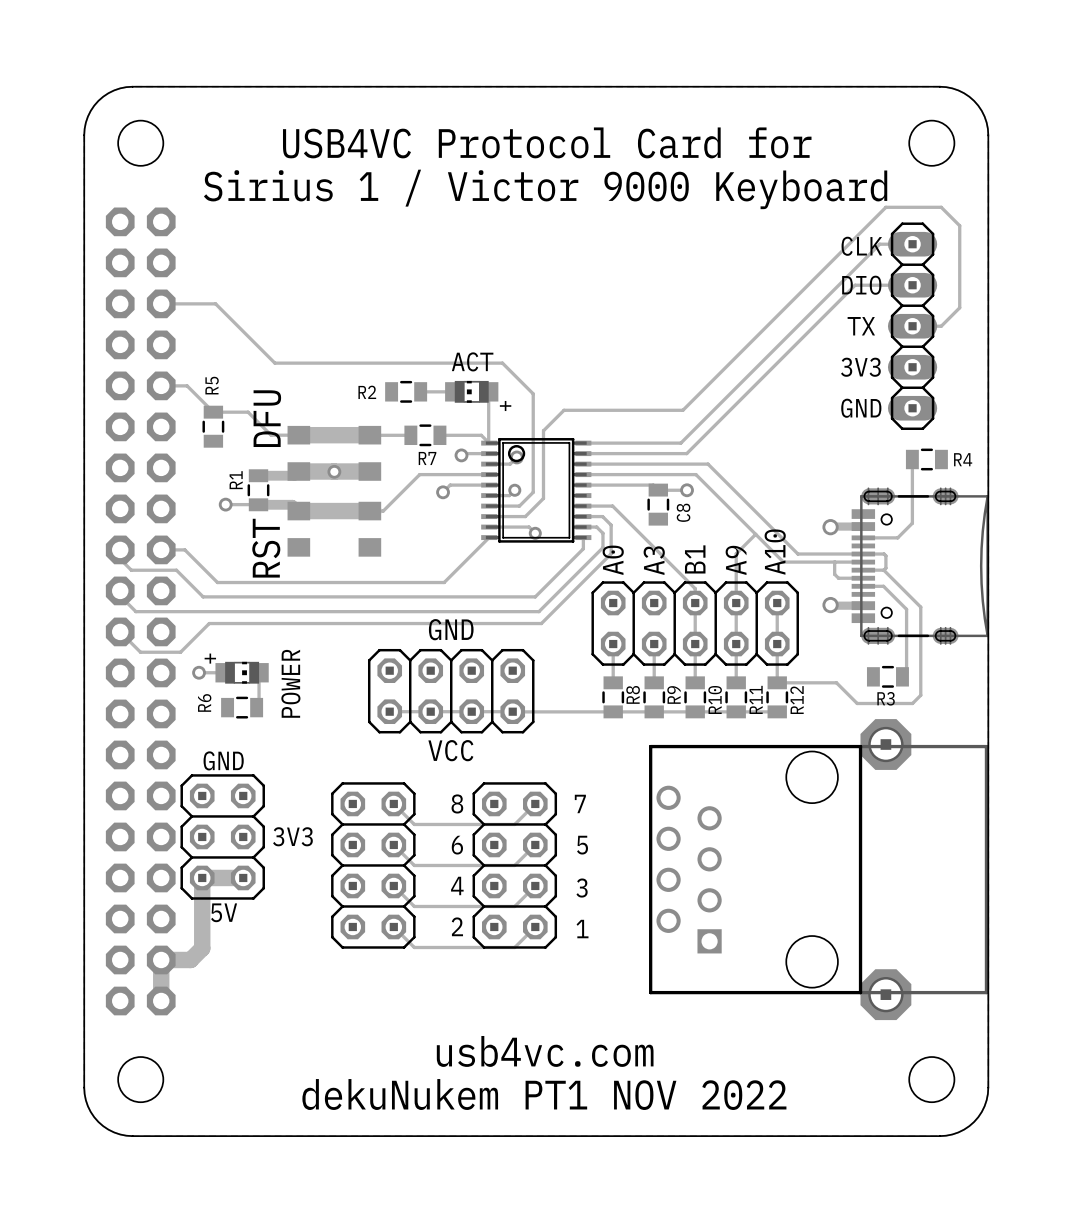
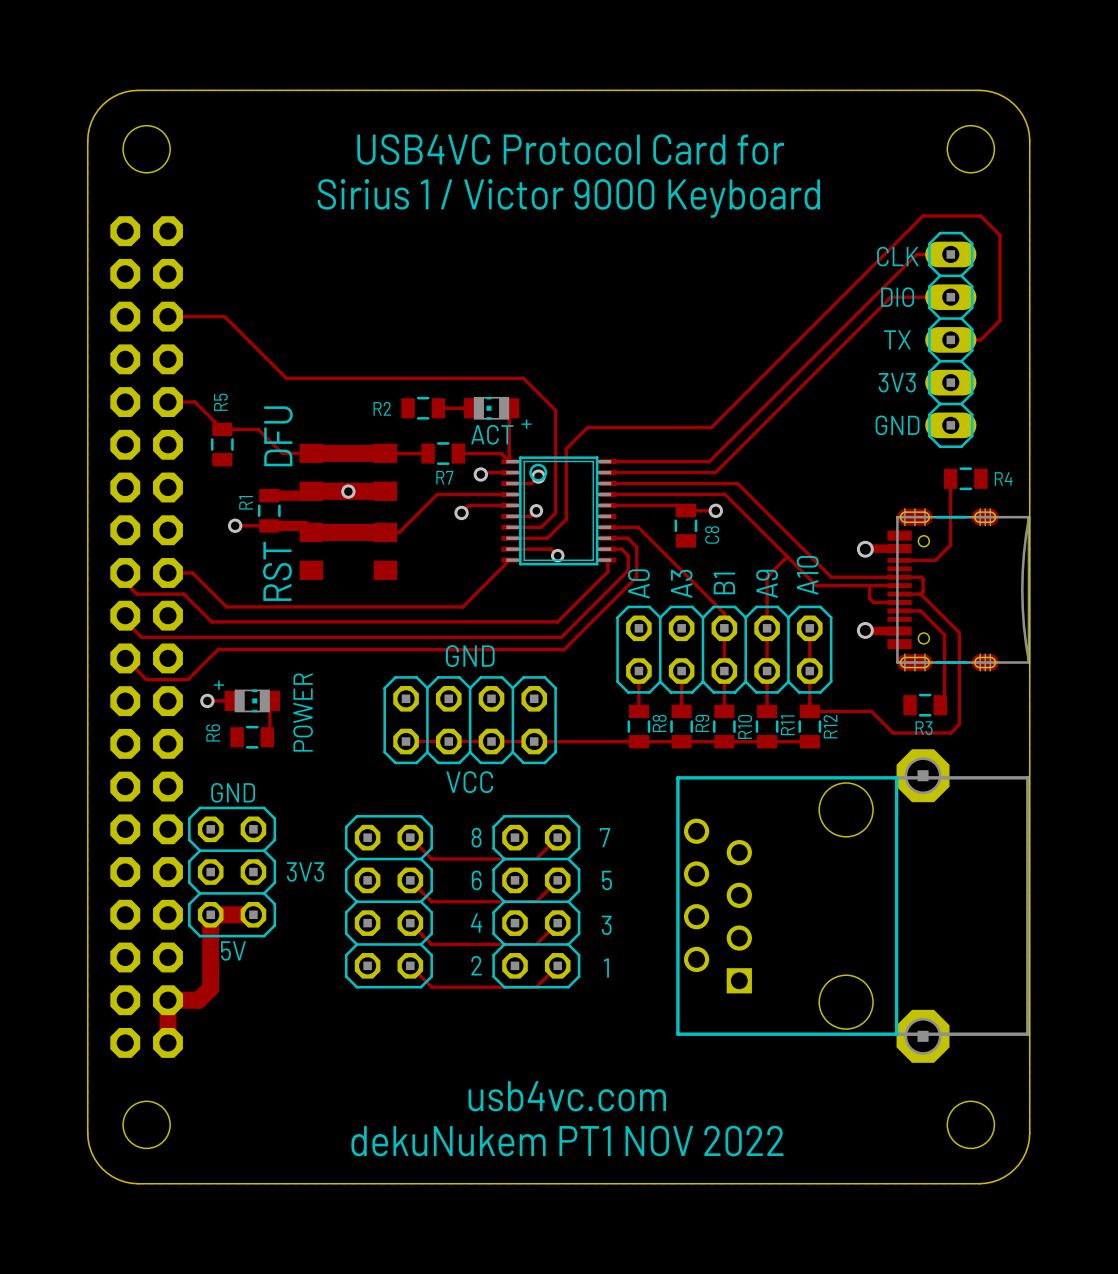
text position: ACT (472, 361) -> ACT (492, 434)

